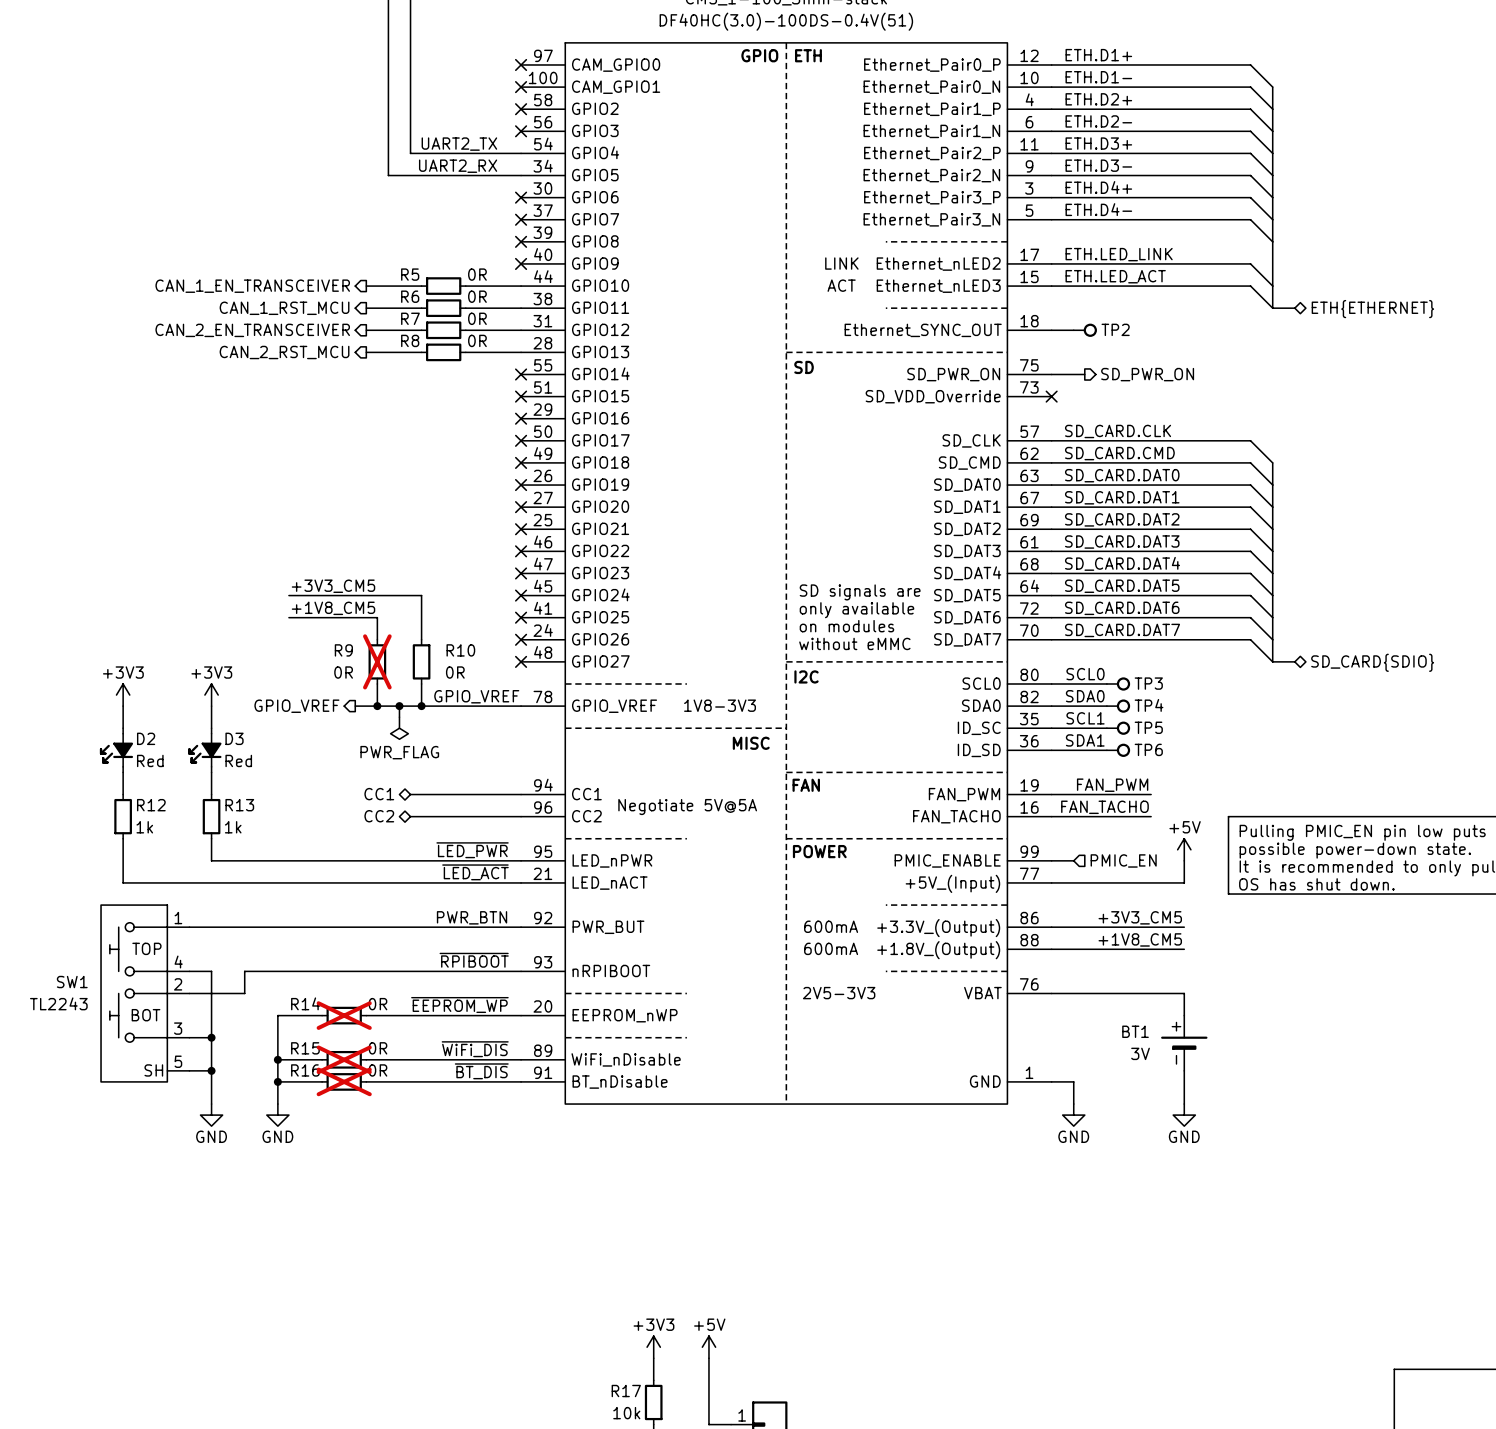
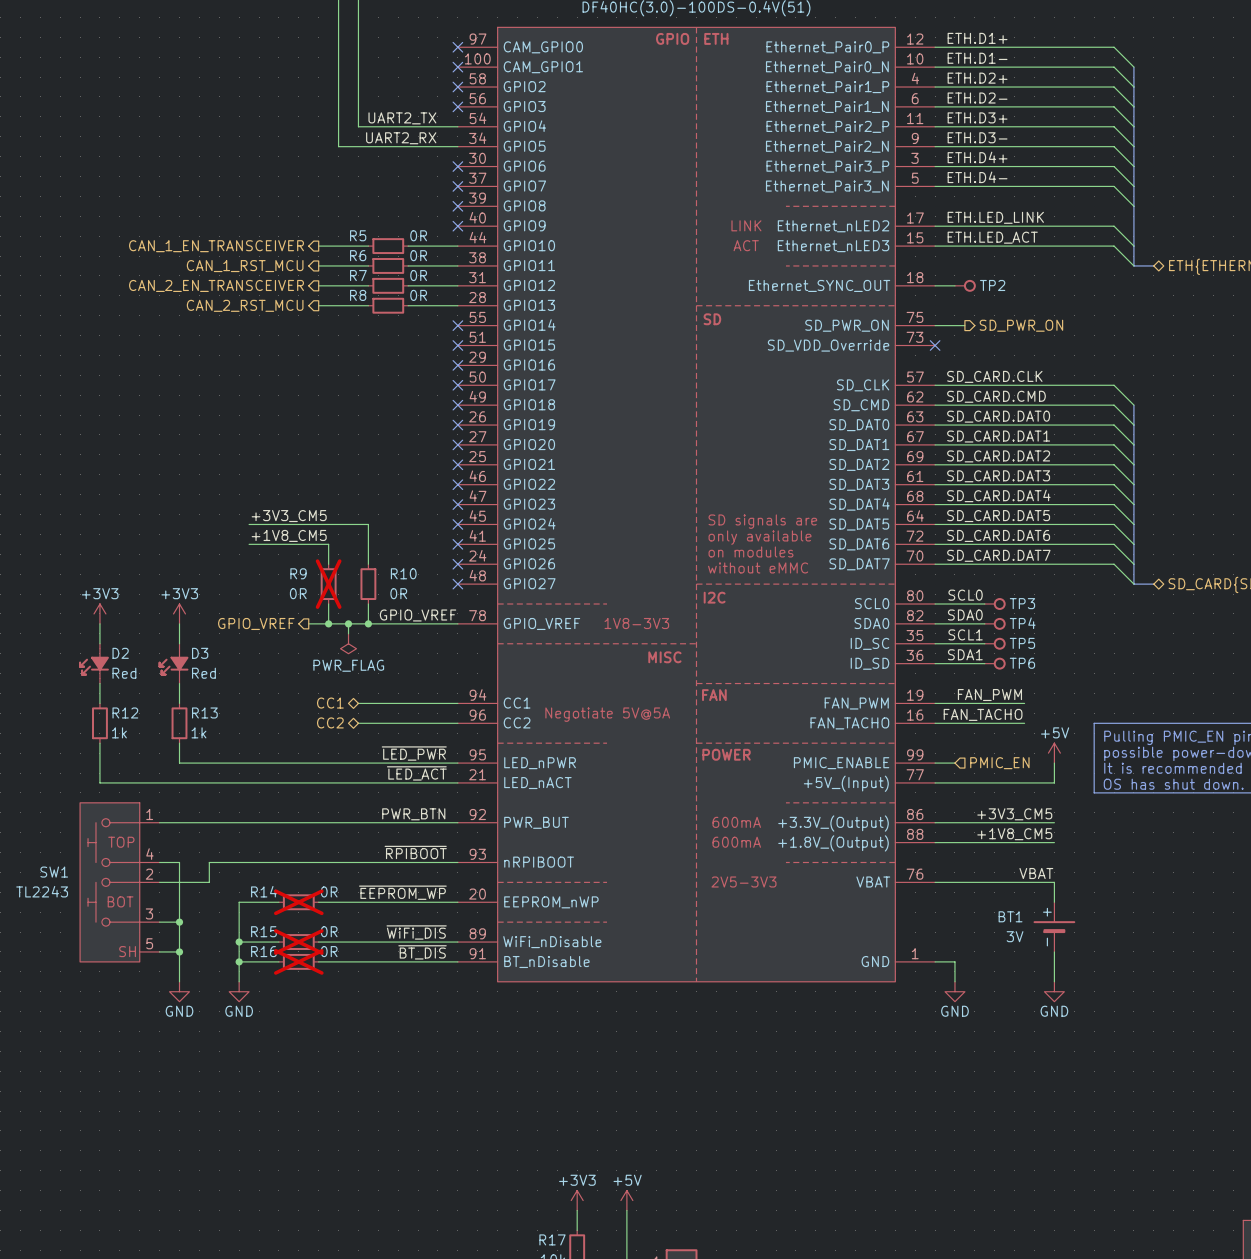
label: none -> VBAT (1036, 873)

